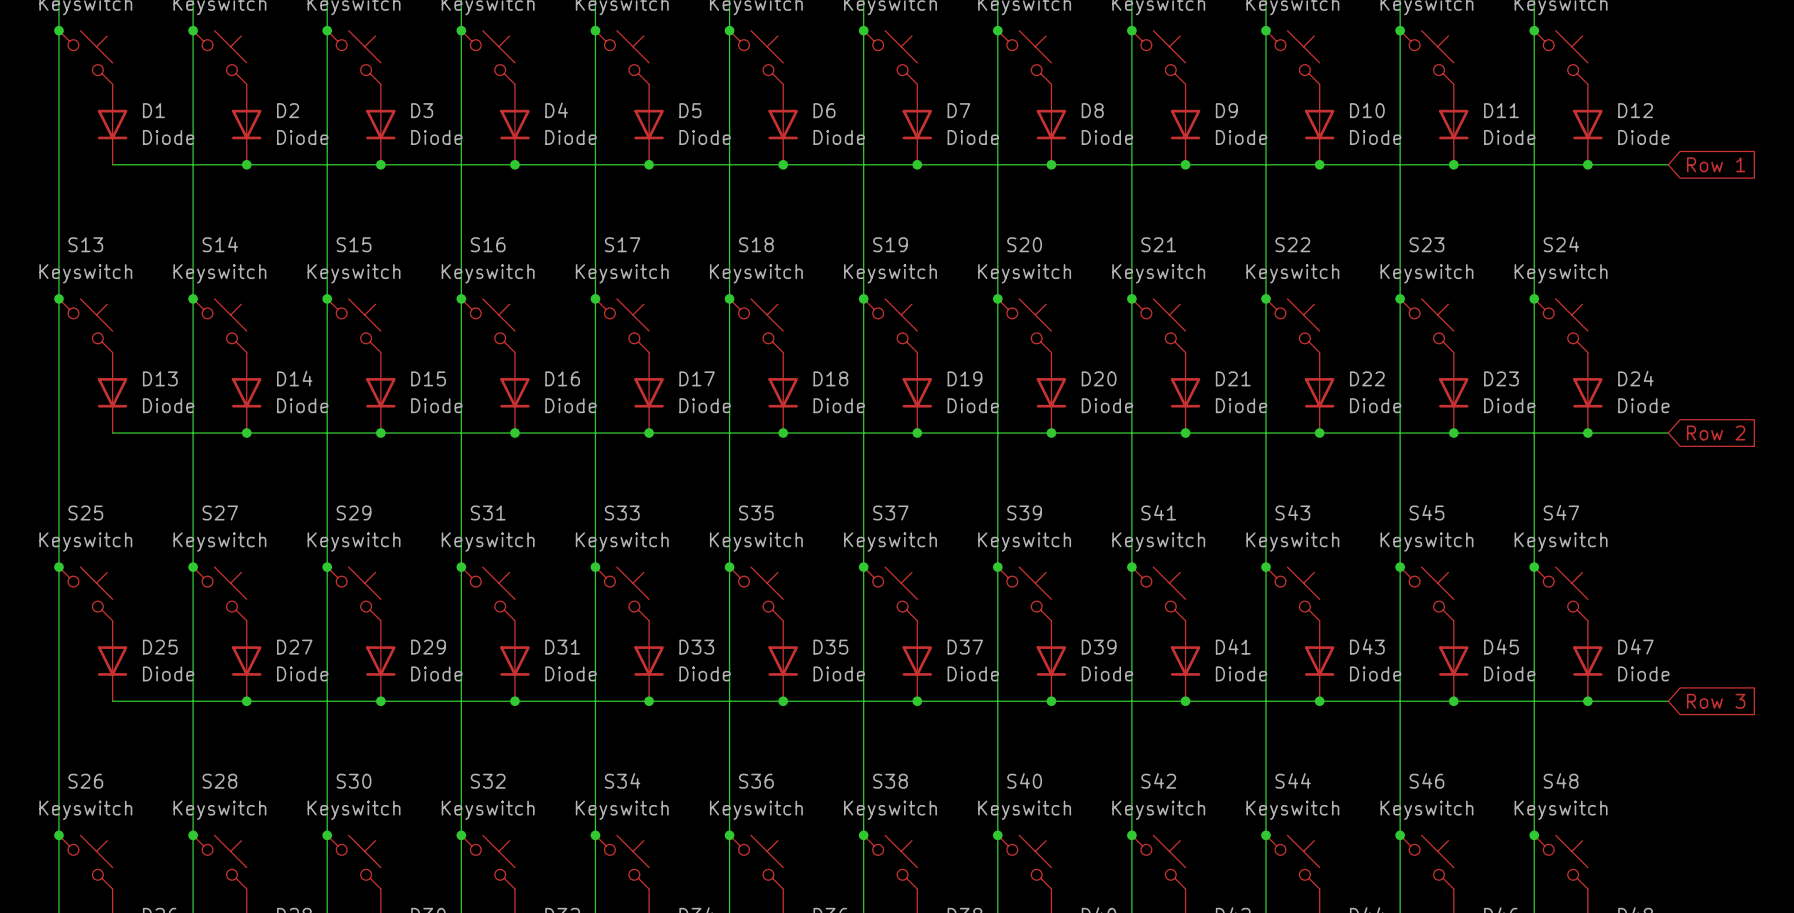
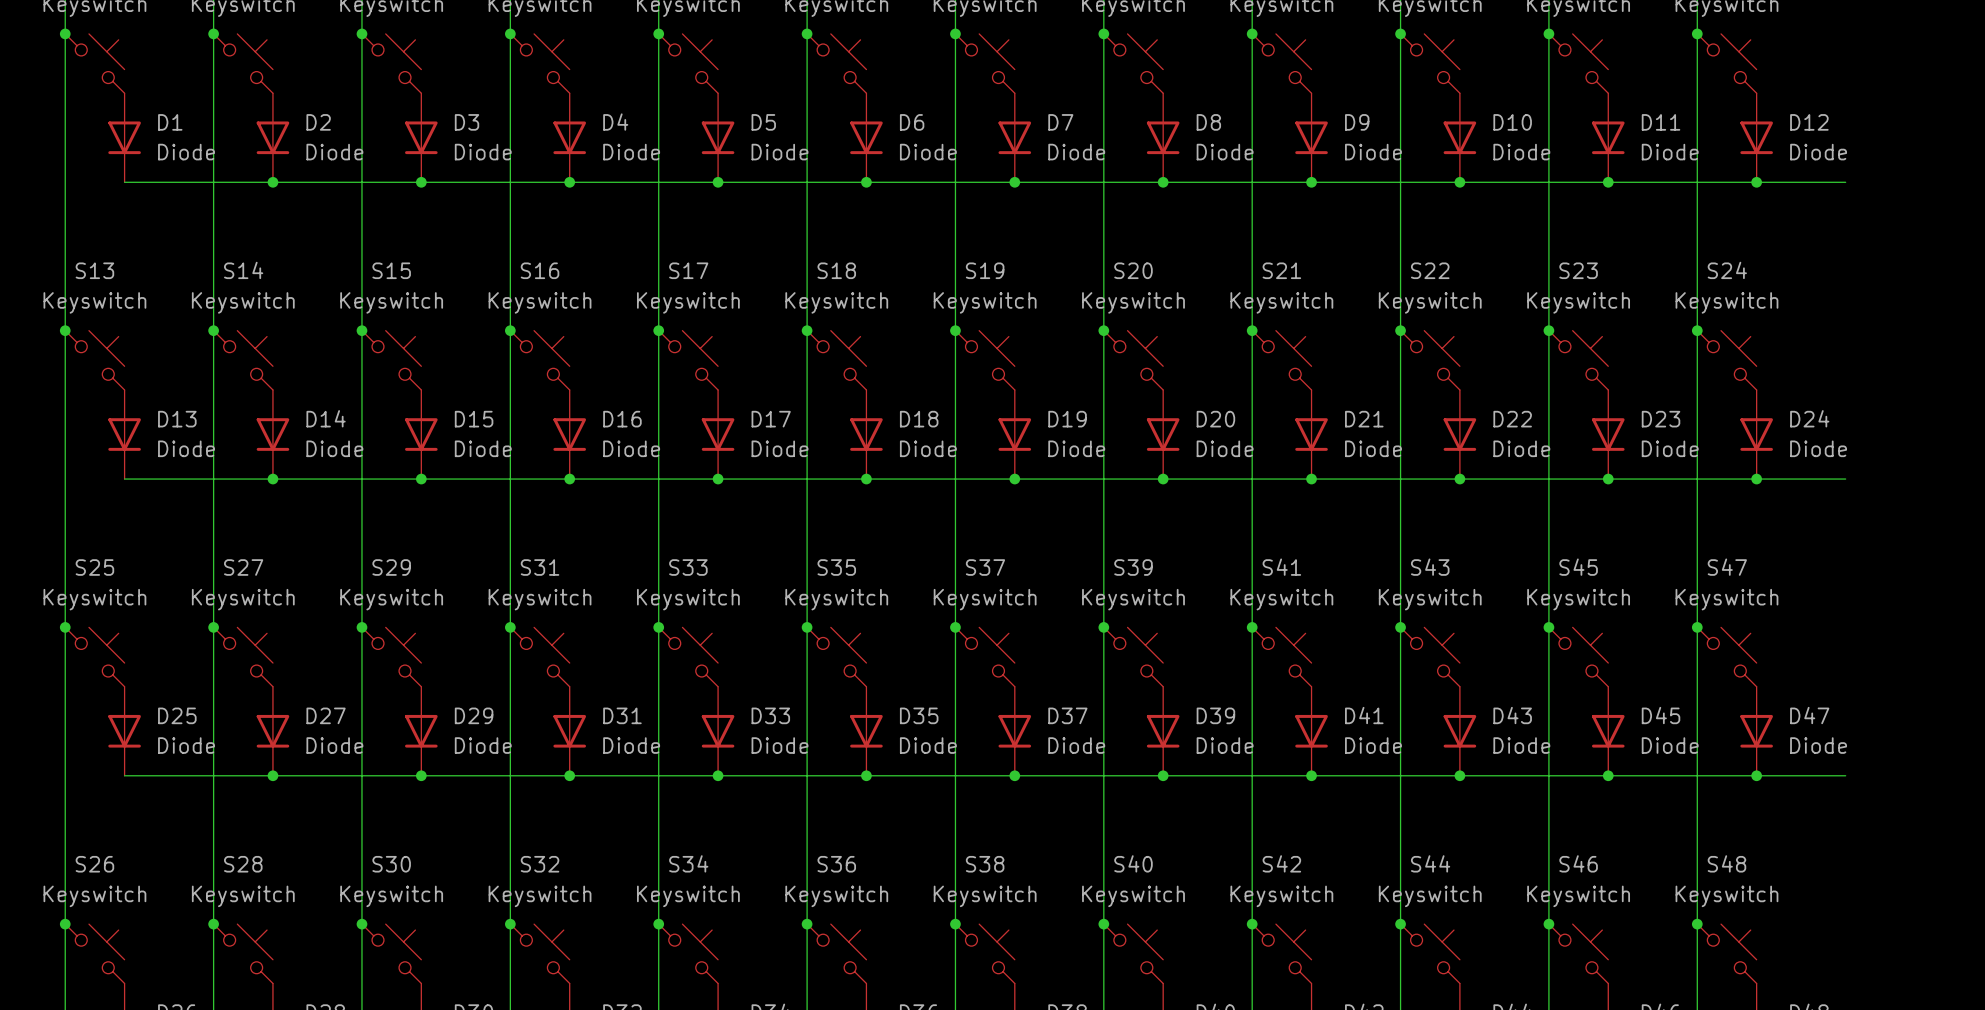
global label: Row 1 (1716, 164) -> none
global label: Row 2 (1716, 433) -> none
global label: Row 3 (1716, 701) -> none

